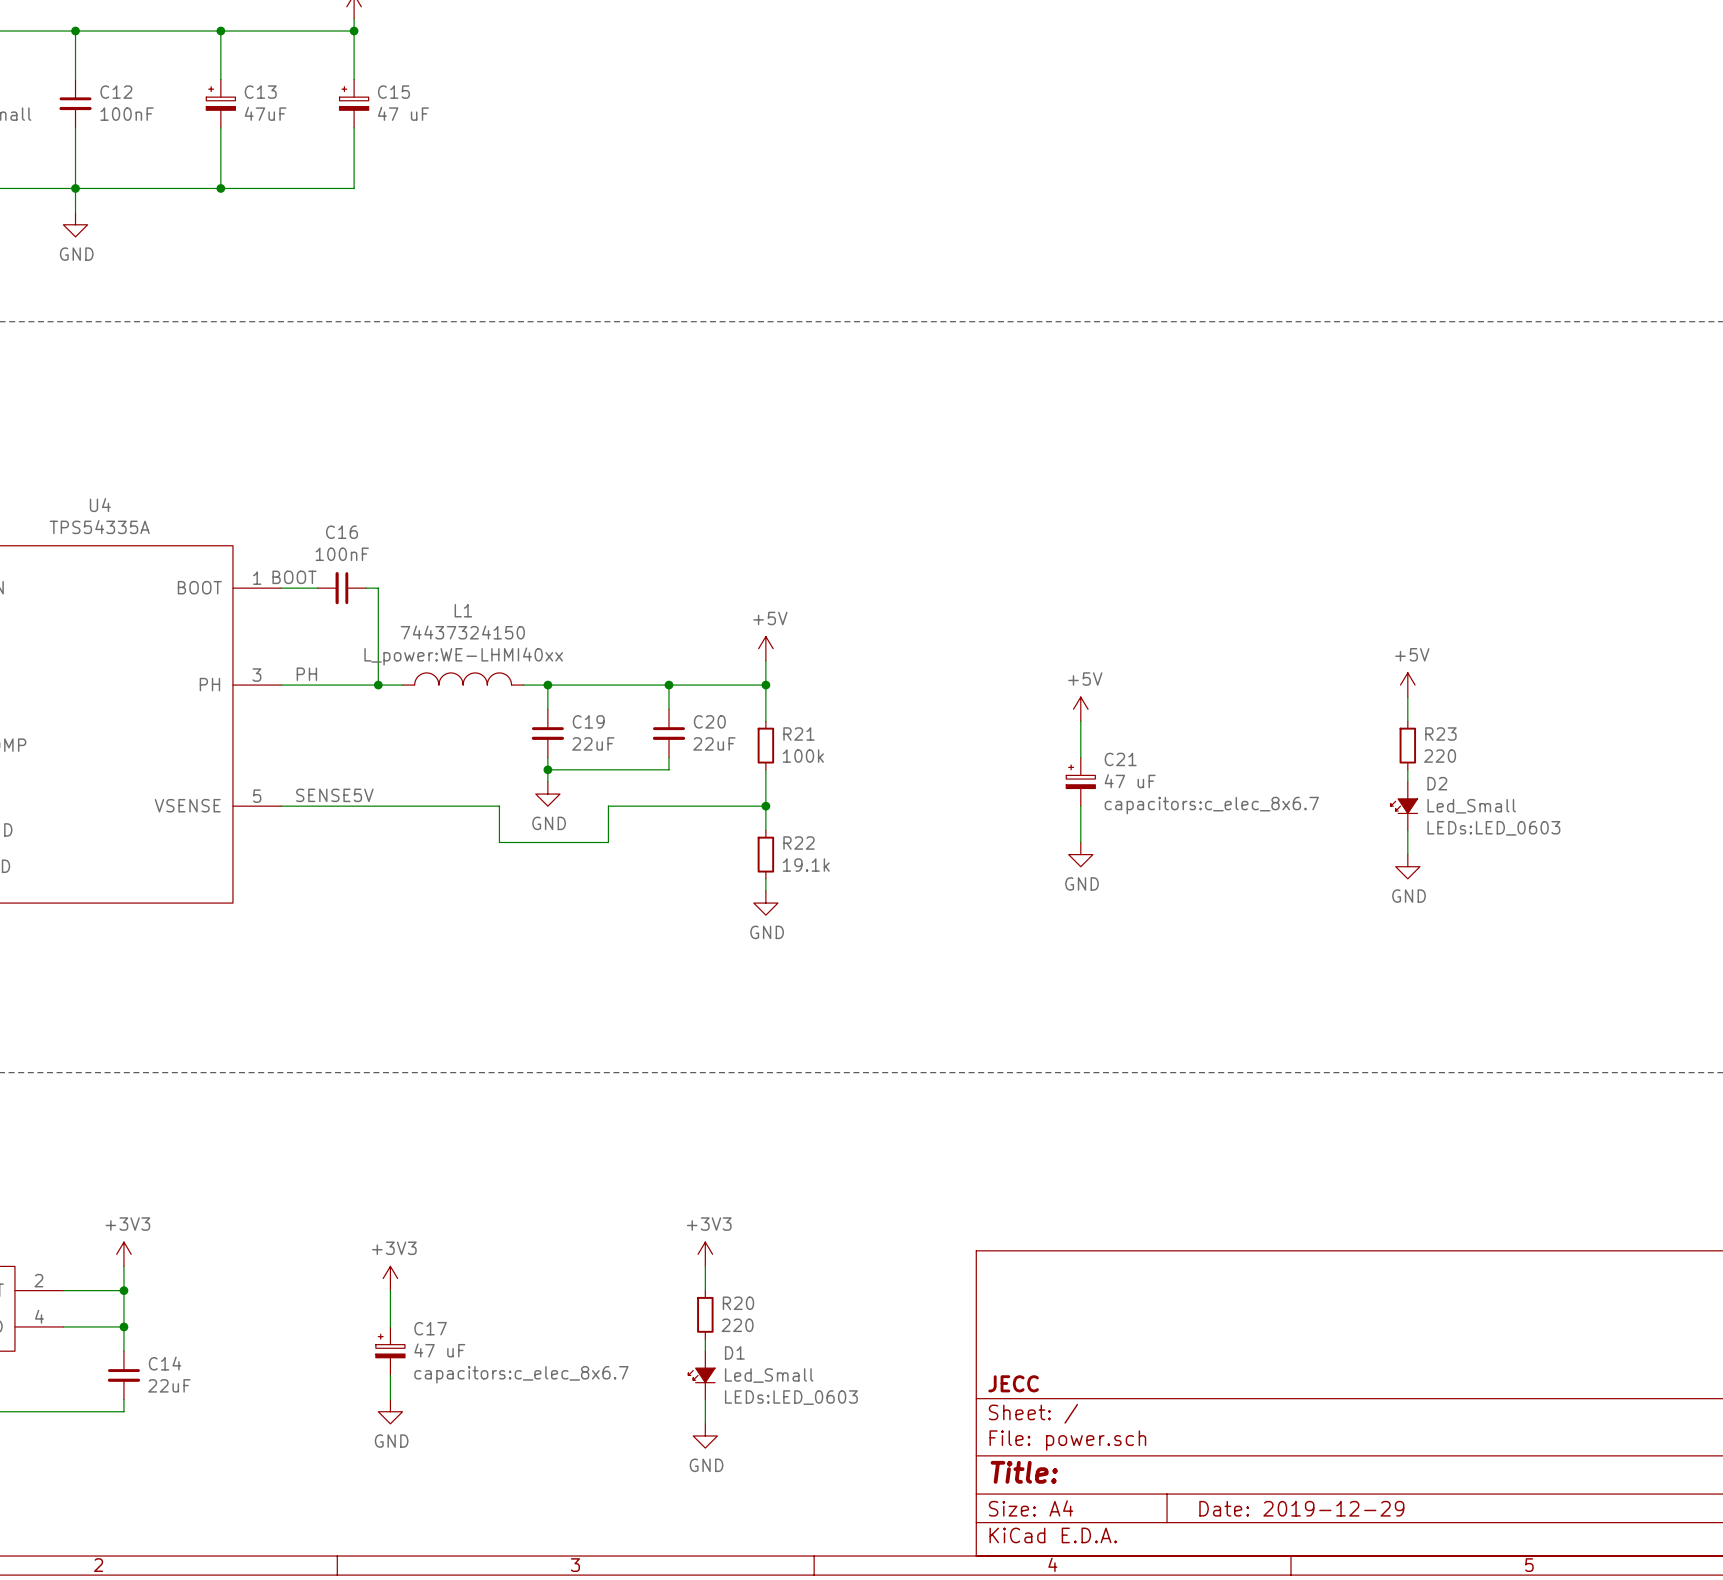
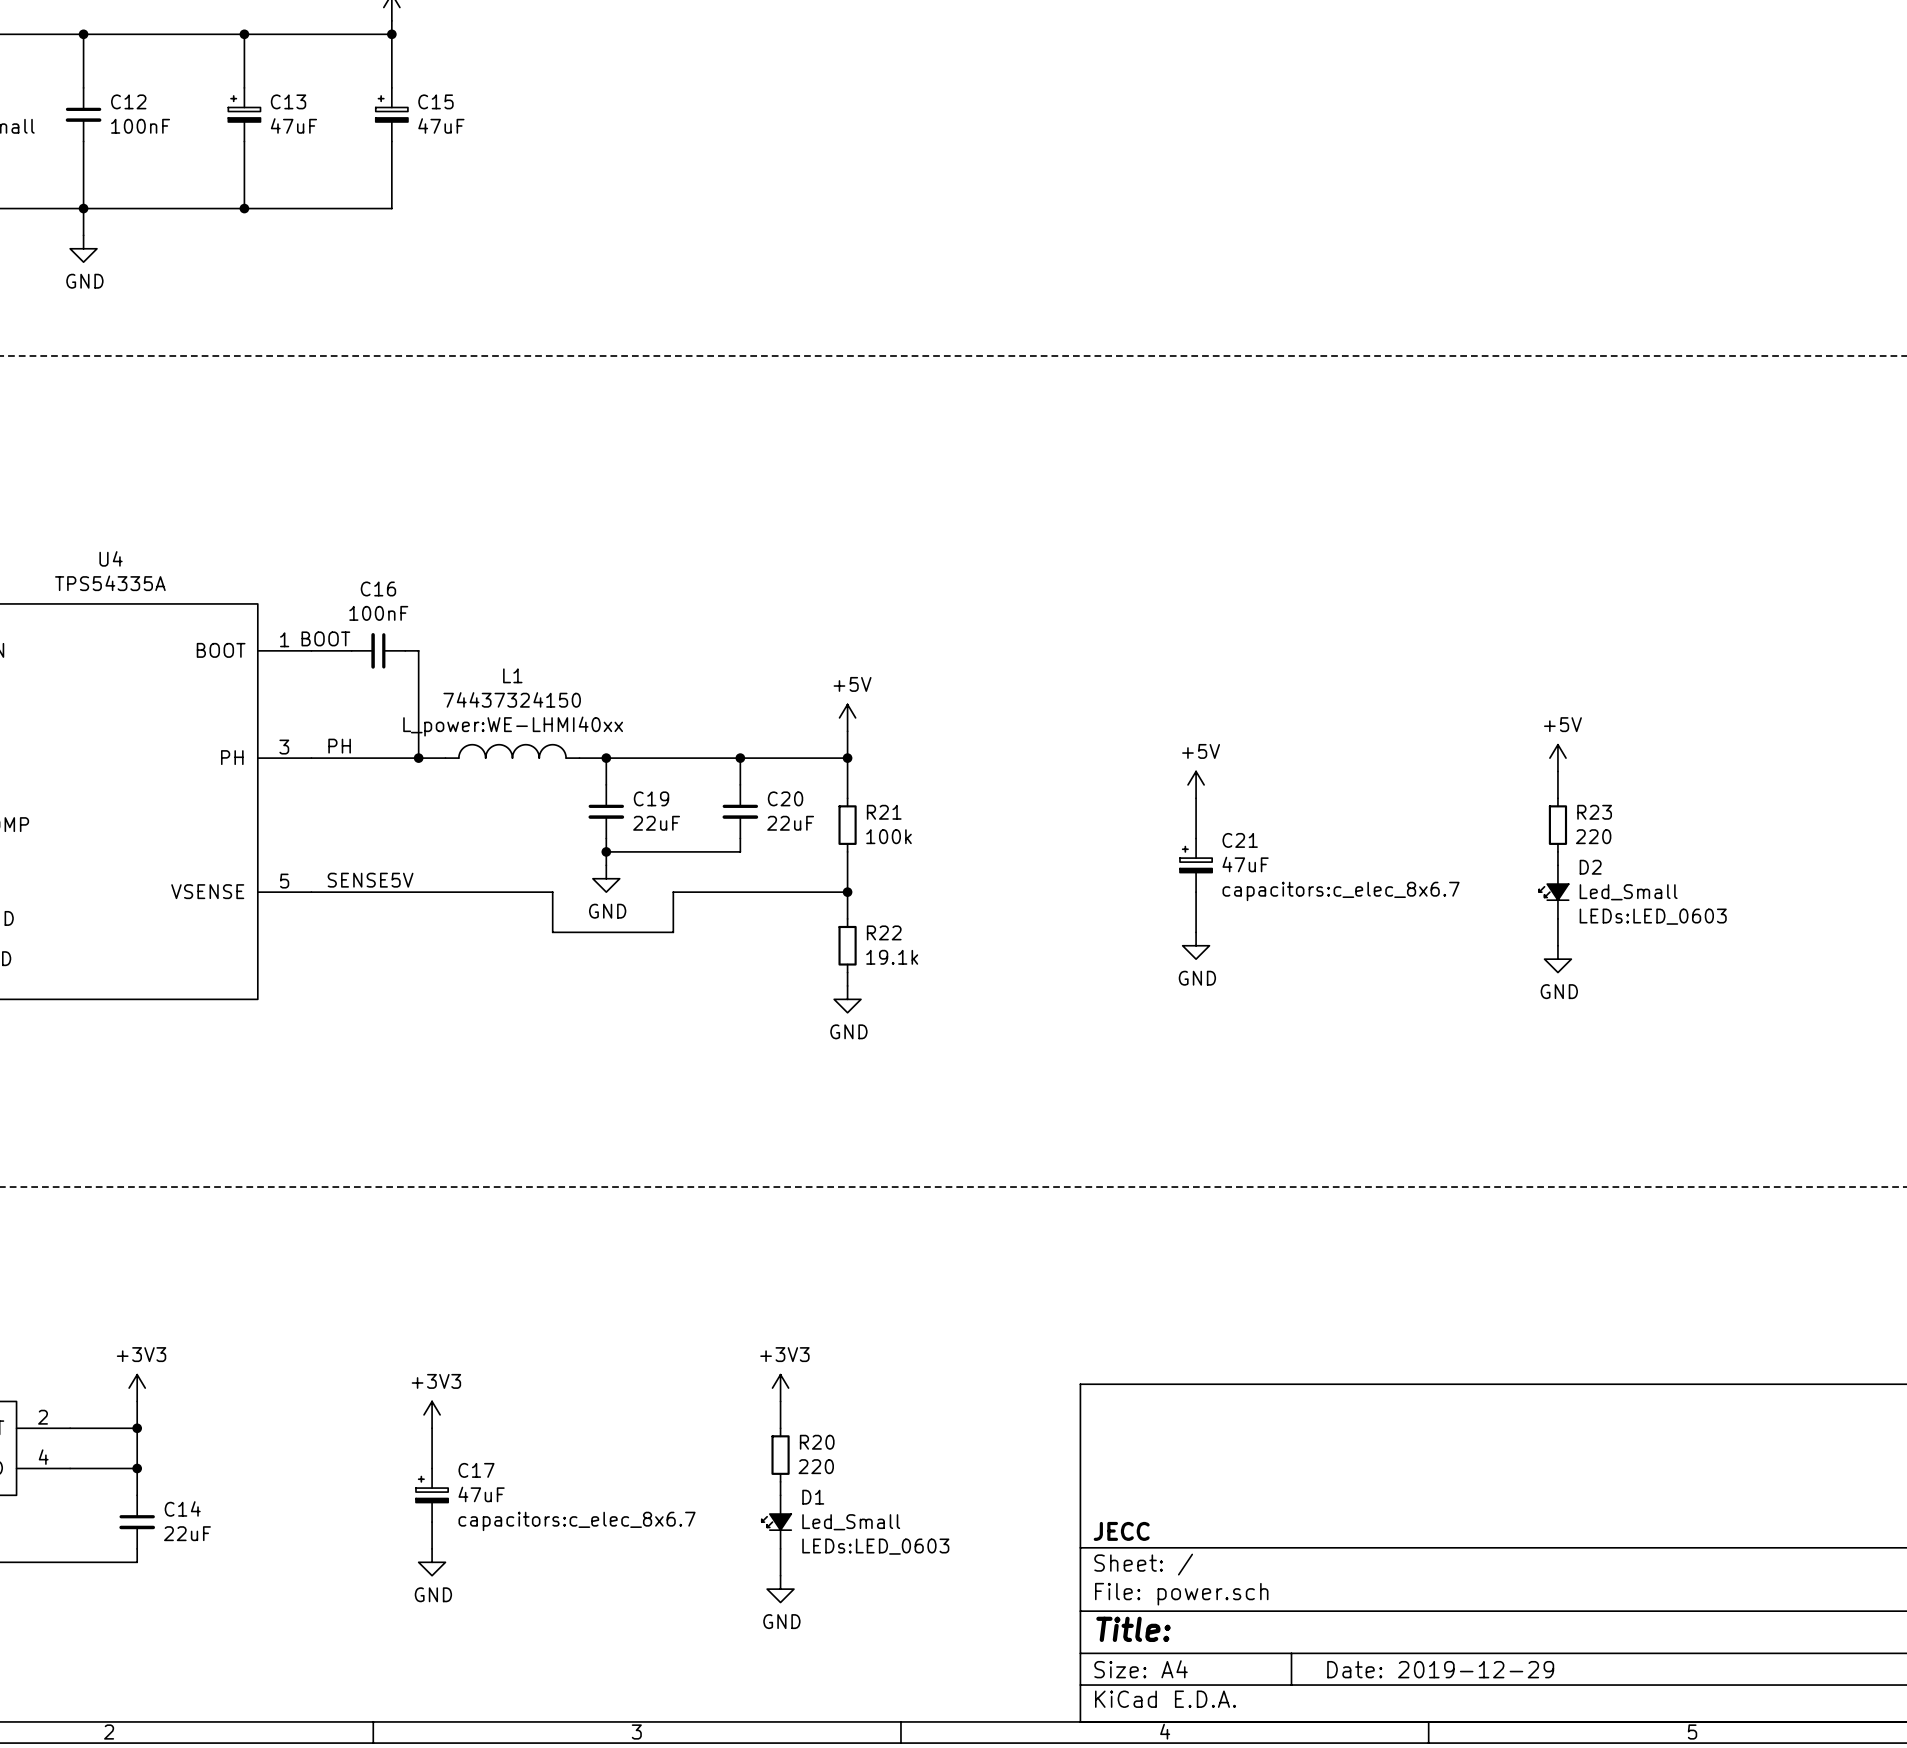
C15 value: 47 uF (403, 113) -> 47uF (441, 125)
C21 value: 47 uF (1130, 781) -> 47uF (1245, 864)
C17 value: 47 uF (439, 1350) -> 47uF (481, 1494)

